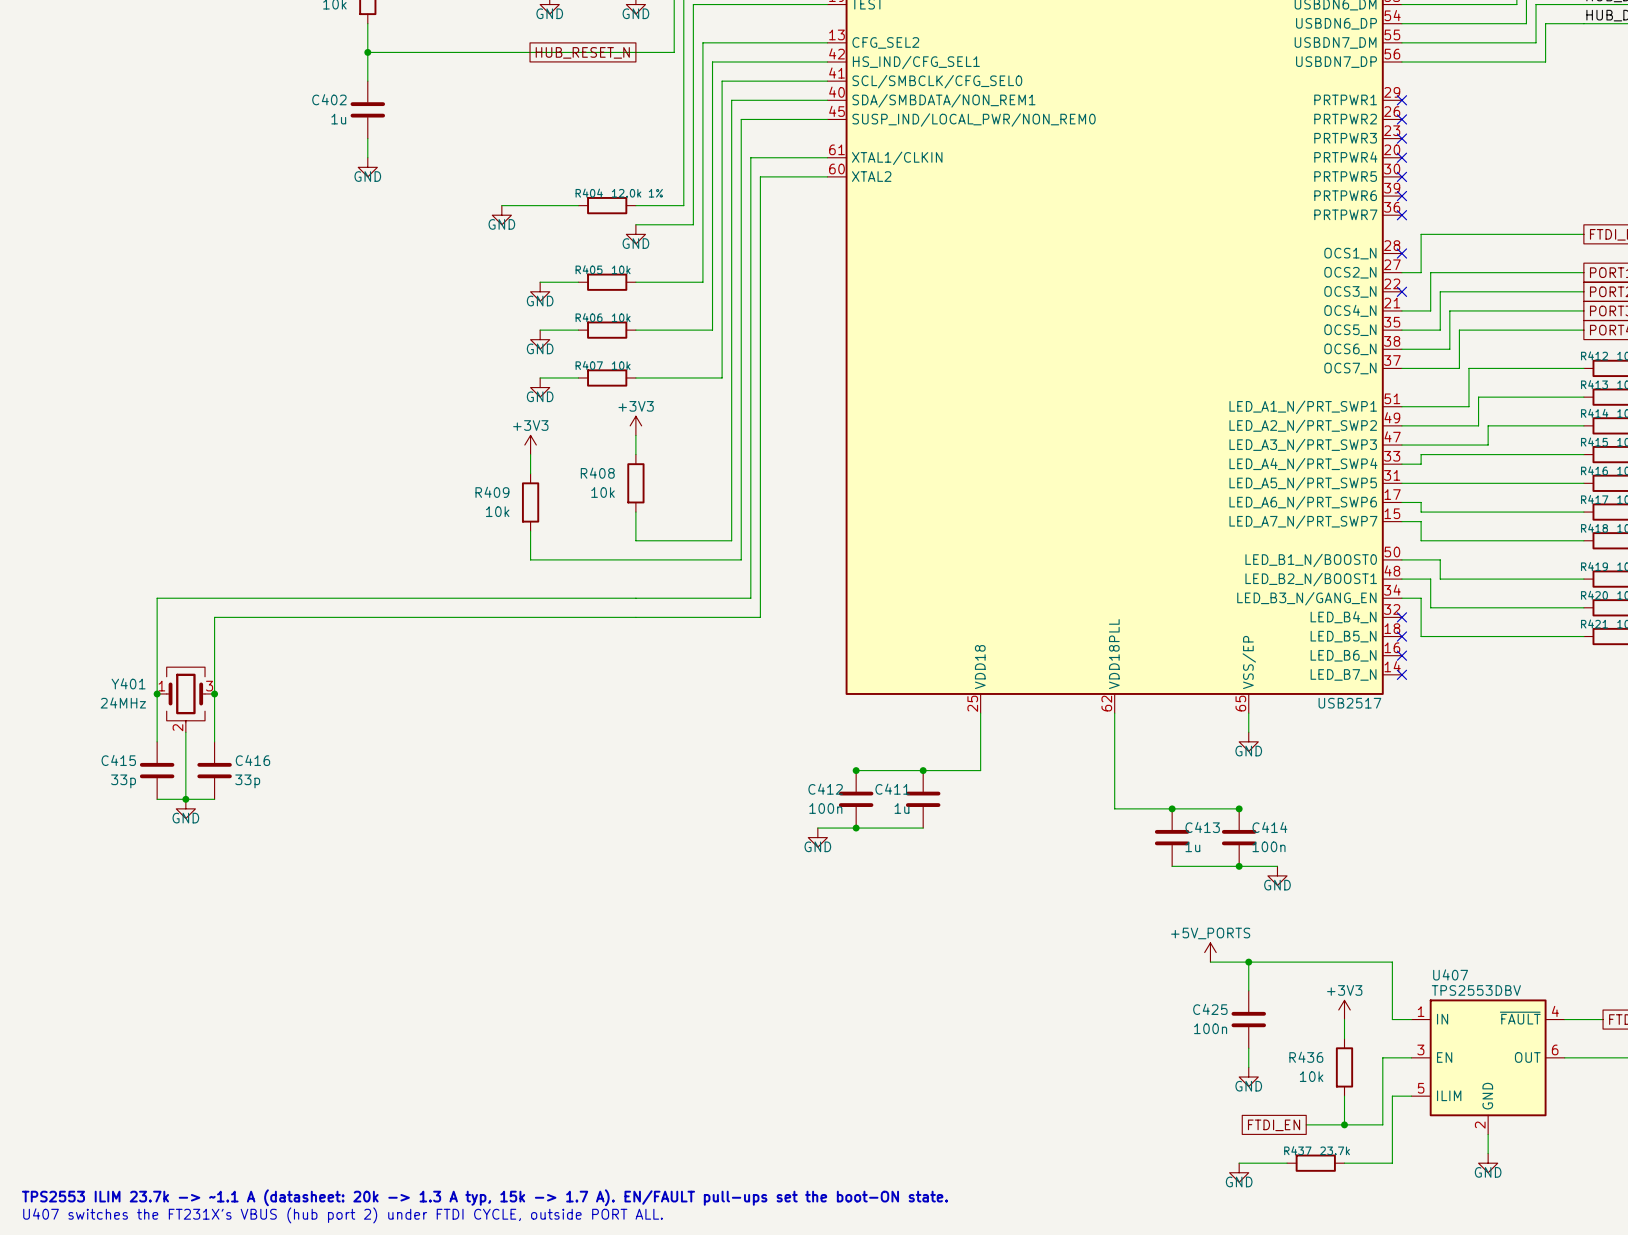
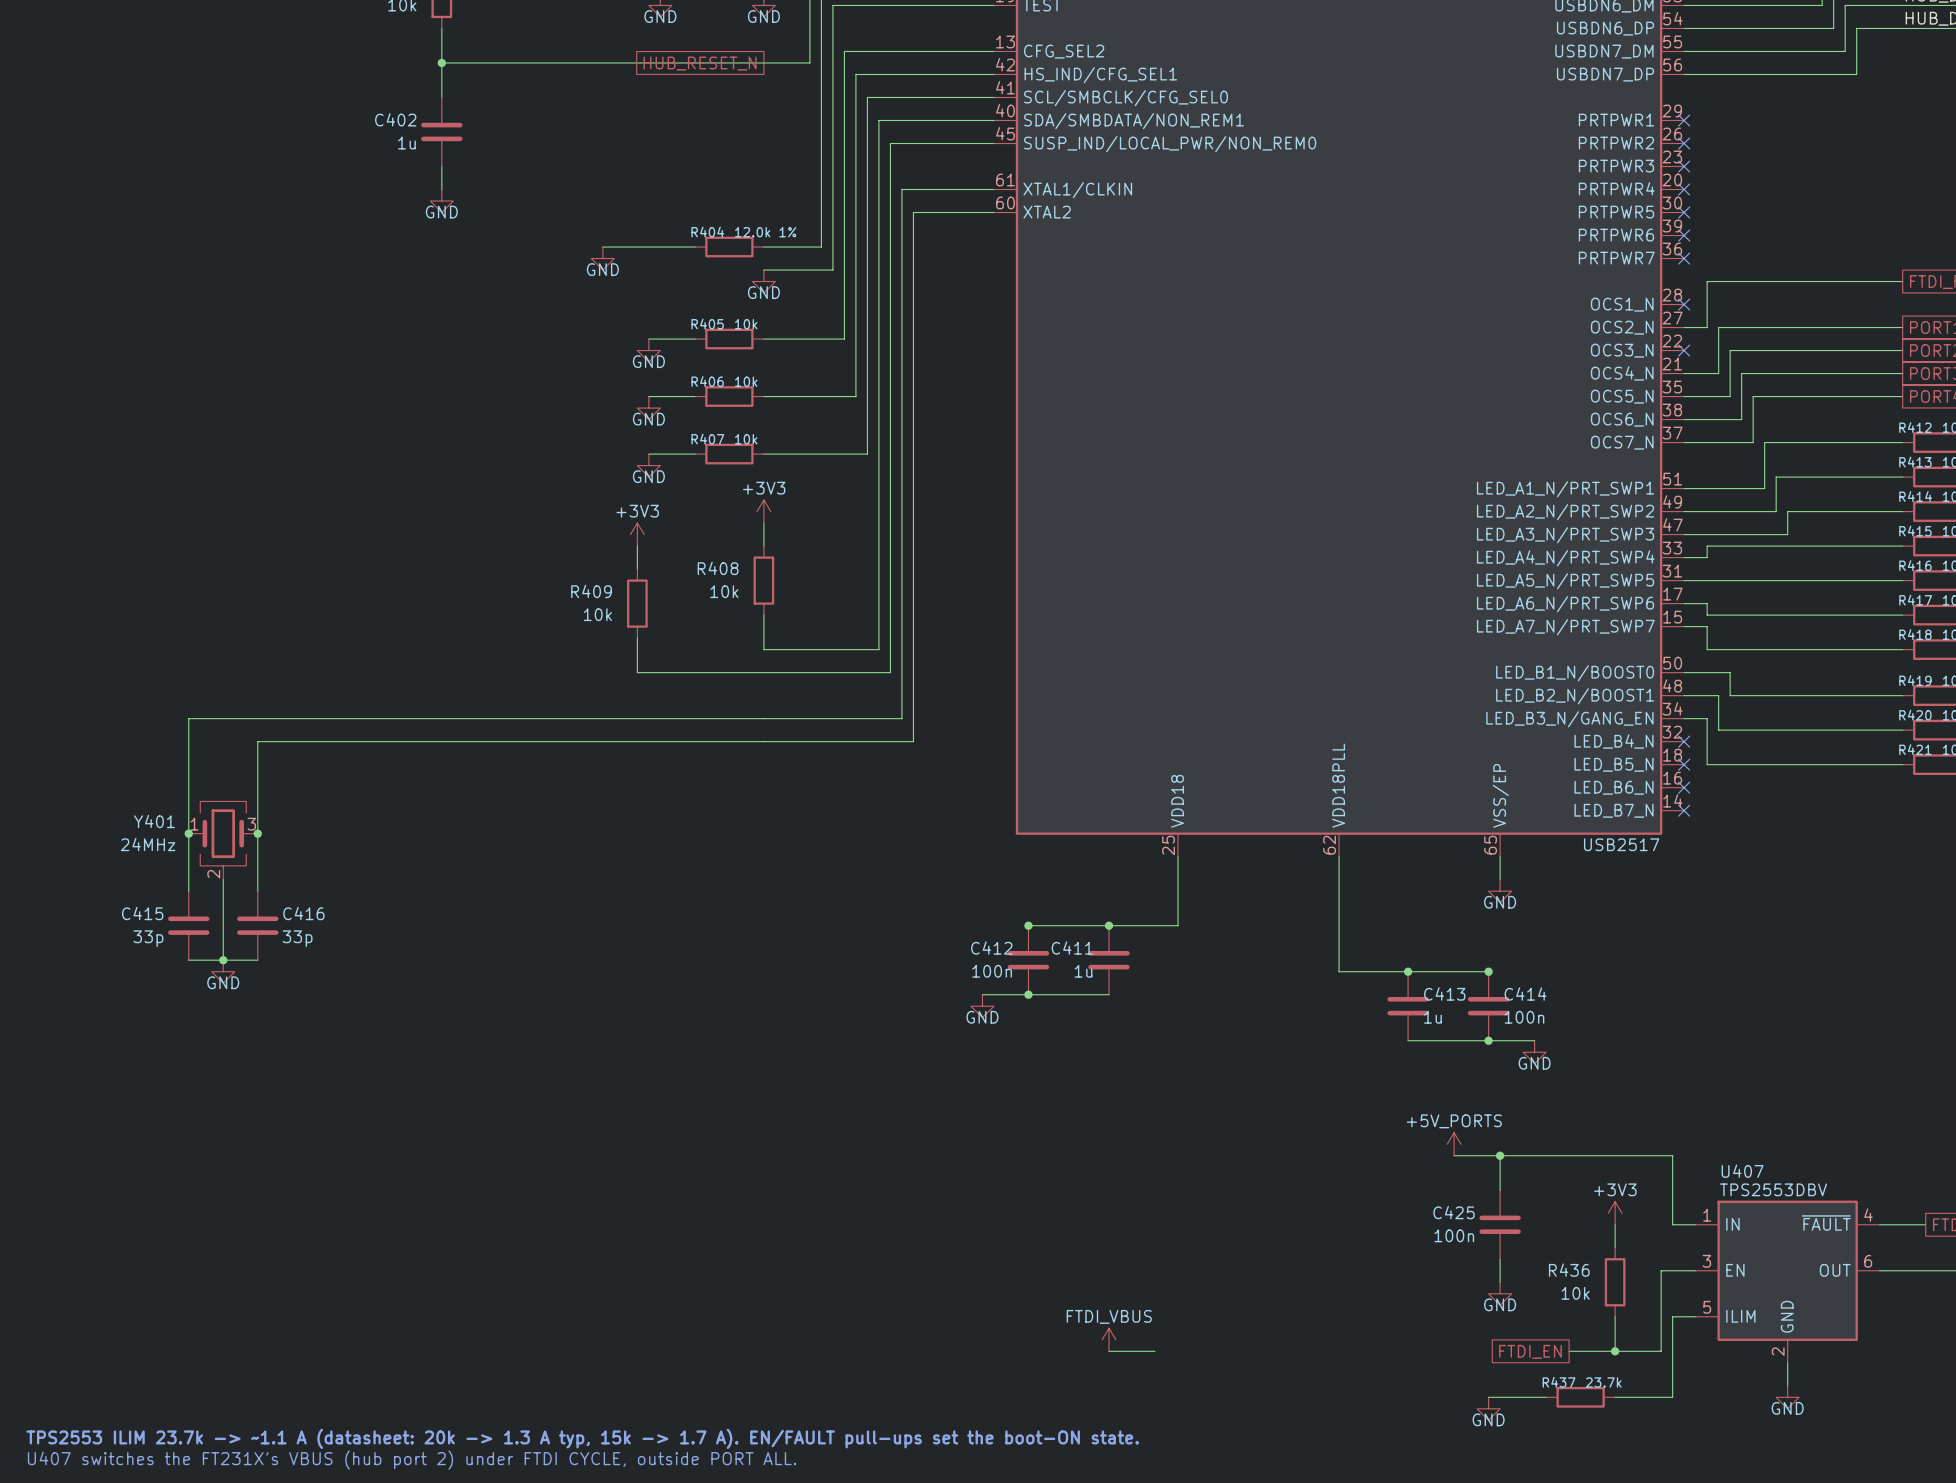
power symbol: none -> FTDI_VBUS (1109, 1339)
wire: none -> (1109, 1351) (1155, 1351)

